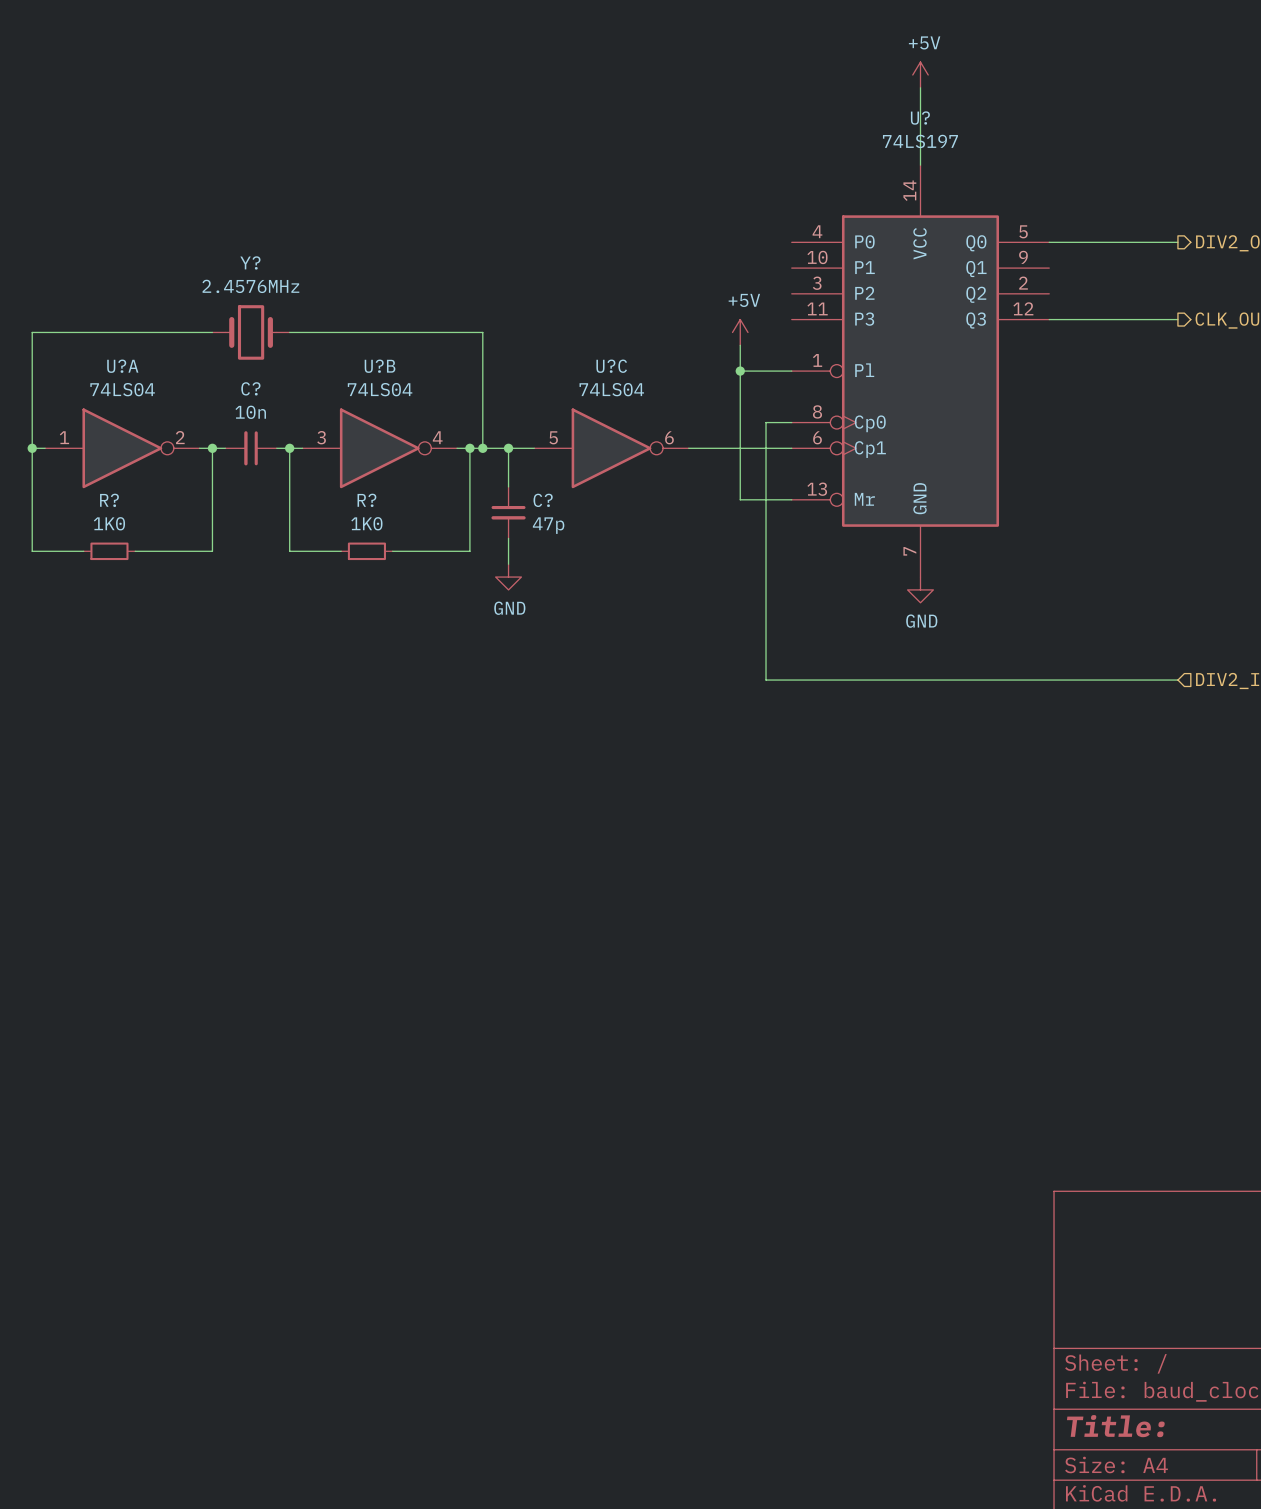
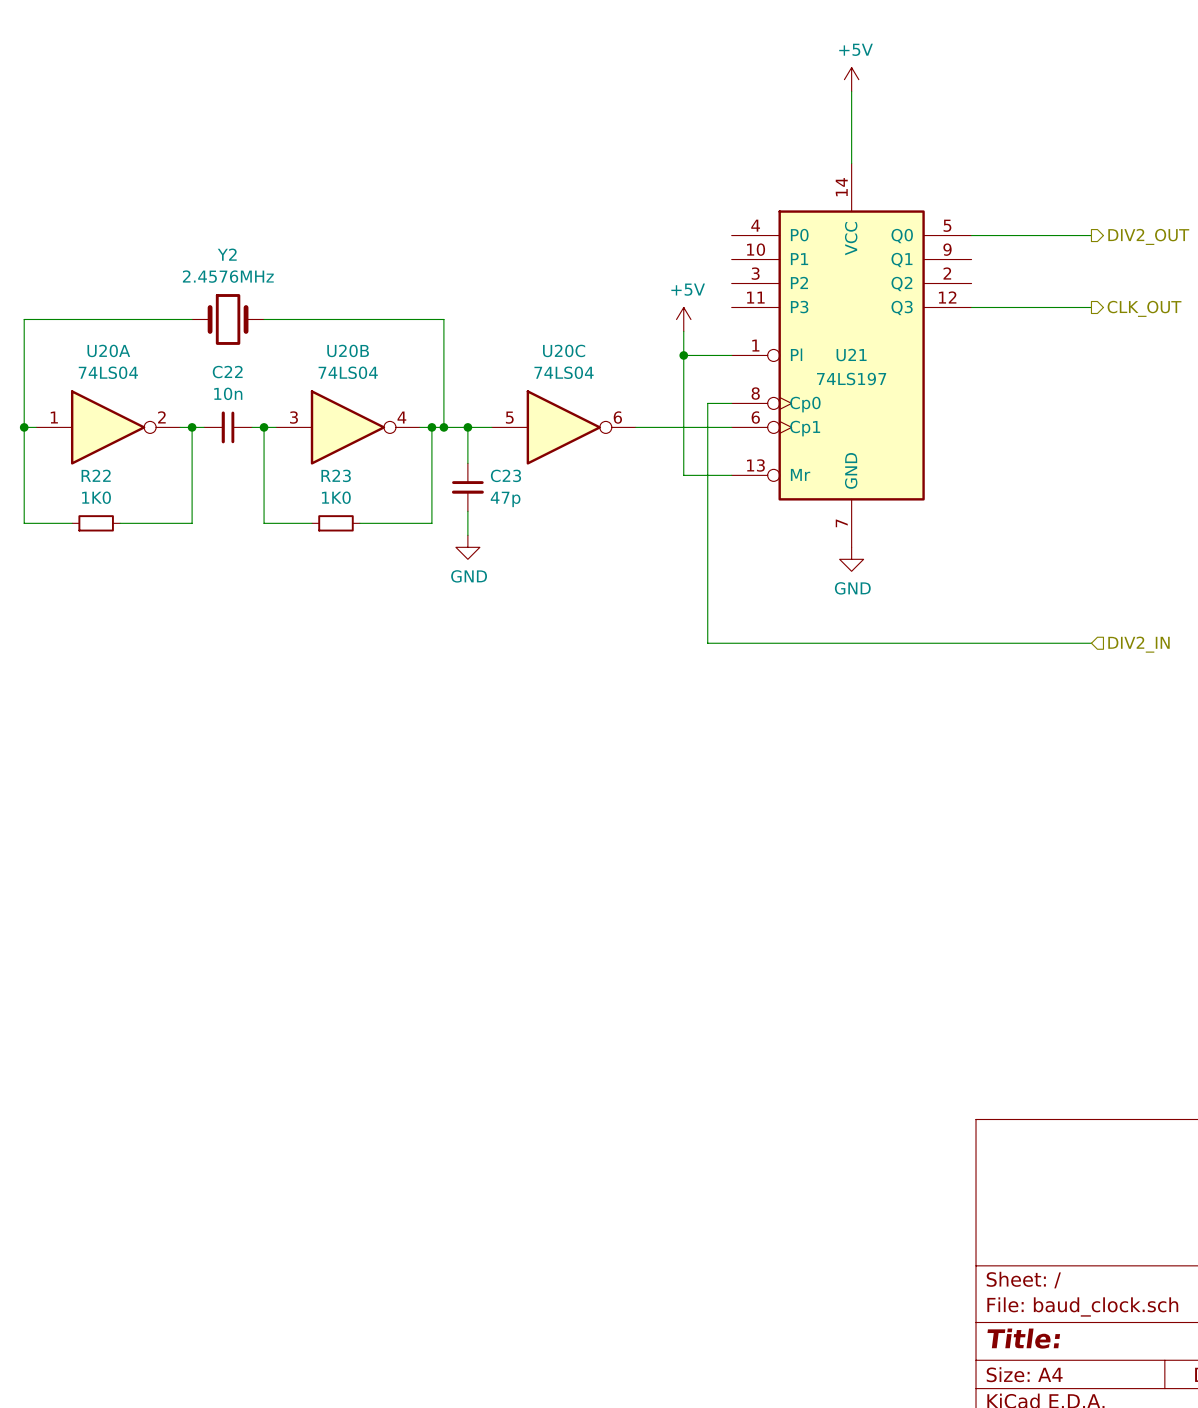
U? name: U? (920, 118) -> U21 (851, 355)
U? value position: 74LS197 (920, 141) -> 74LS197 (851, 379)
Y? name: Y? (250, 262) -> Y2 (227, 254)
U?A name: U?A (122, 366) -> U20A (108, 350)
U?B name: U?B (380, 366) -> U20B (348, 350)
U?C name: U?C (611, 366) -> U20C (564, 350)
C? name: C? (250, 388) -> C22 (227, 372)
R? name: R? (109, 500) -> R22 (96, 475)
R? name: R? (366, 500) -> R23 (336, 475)
C? name: C? (543, 500) -> C23 (505, 475)

